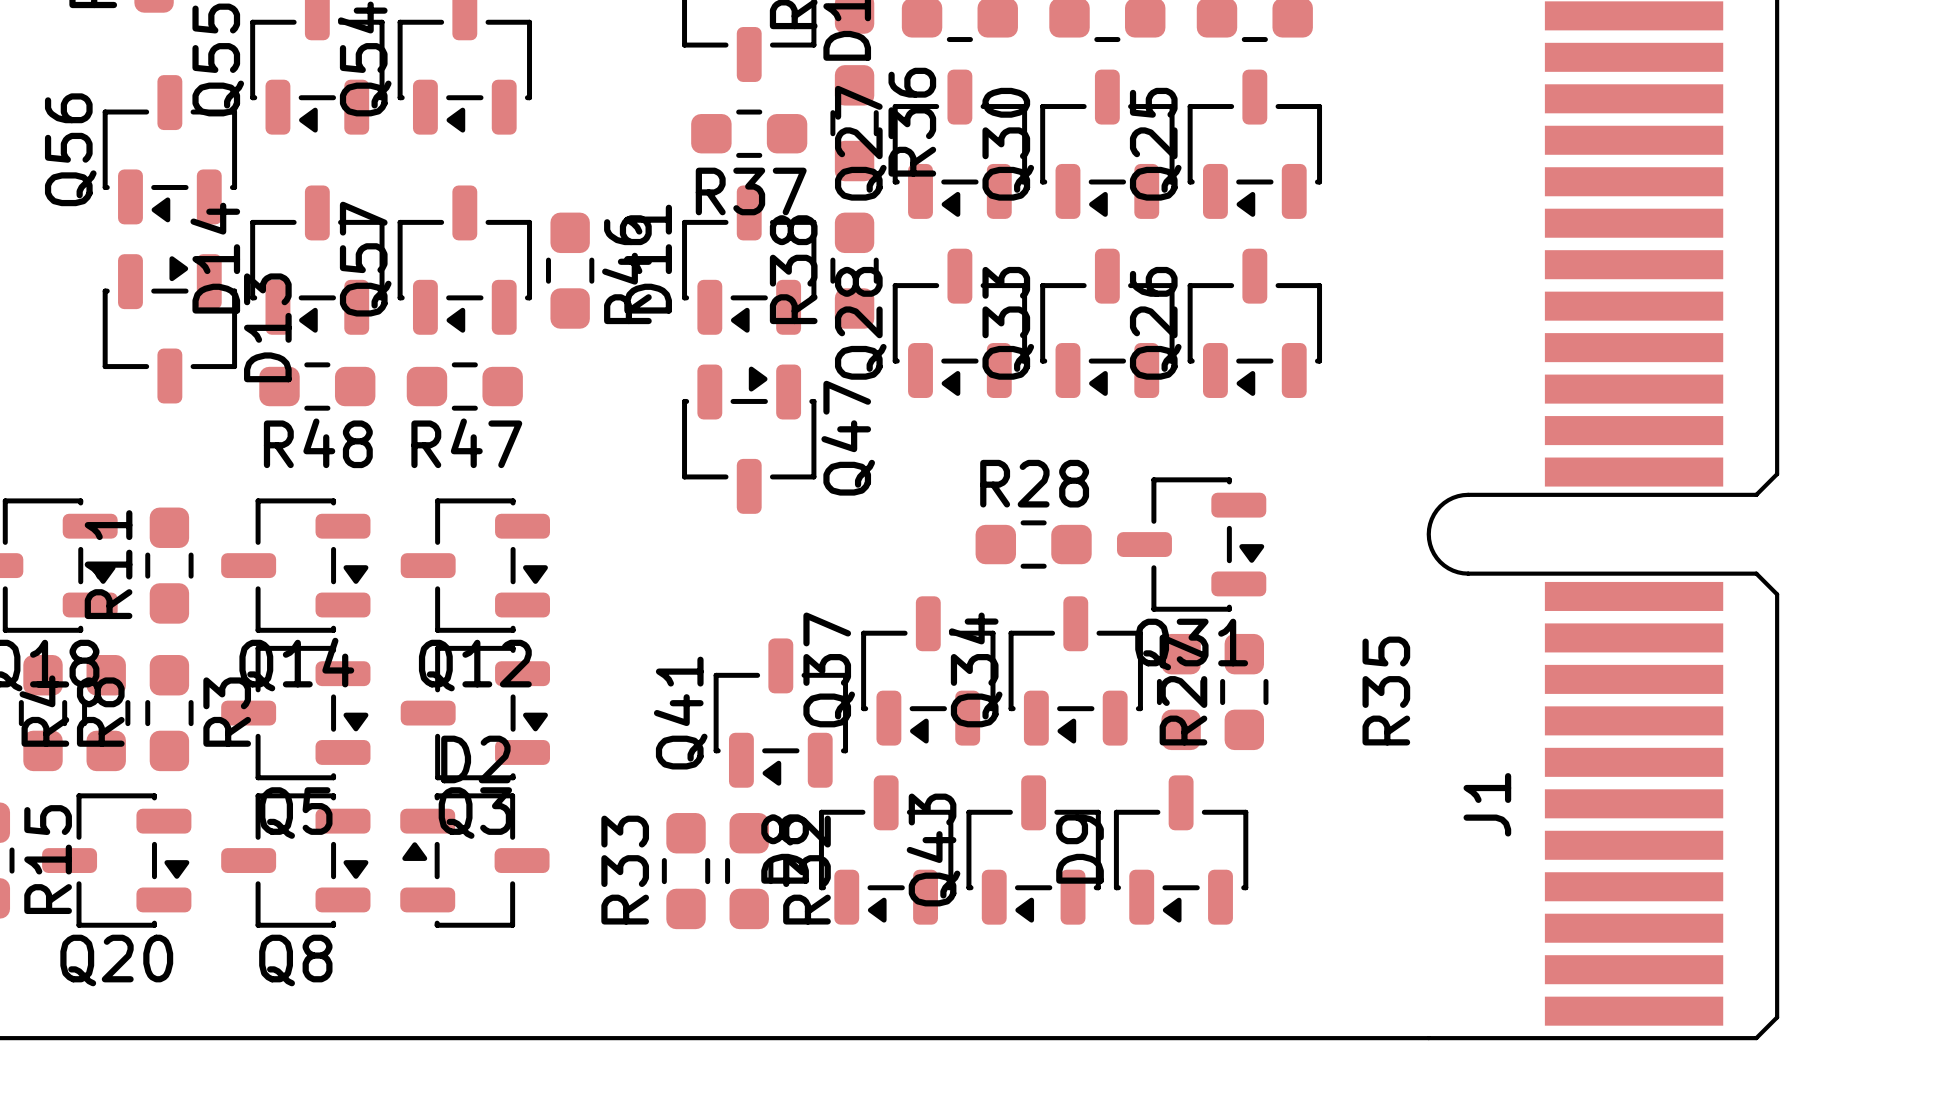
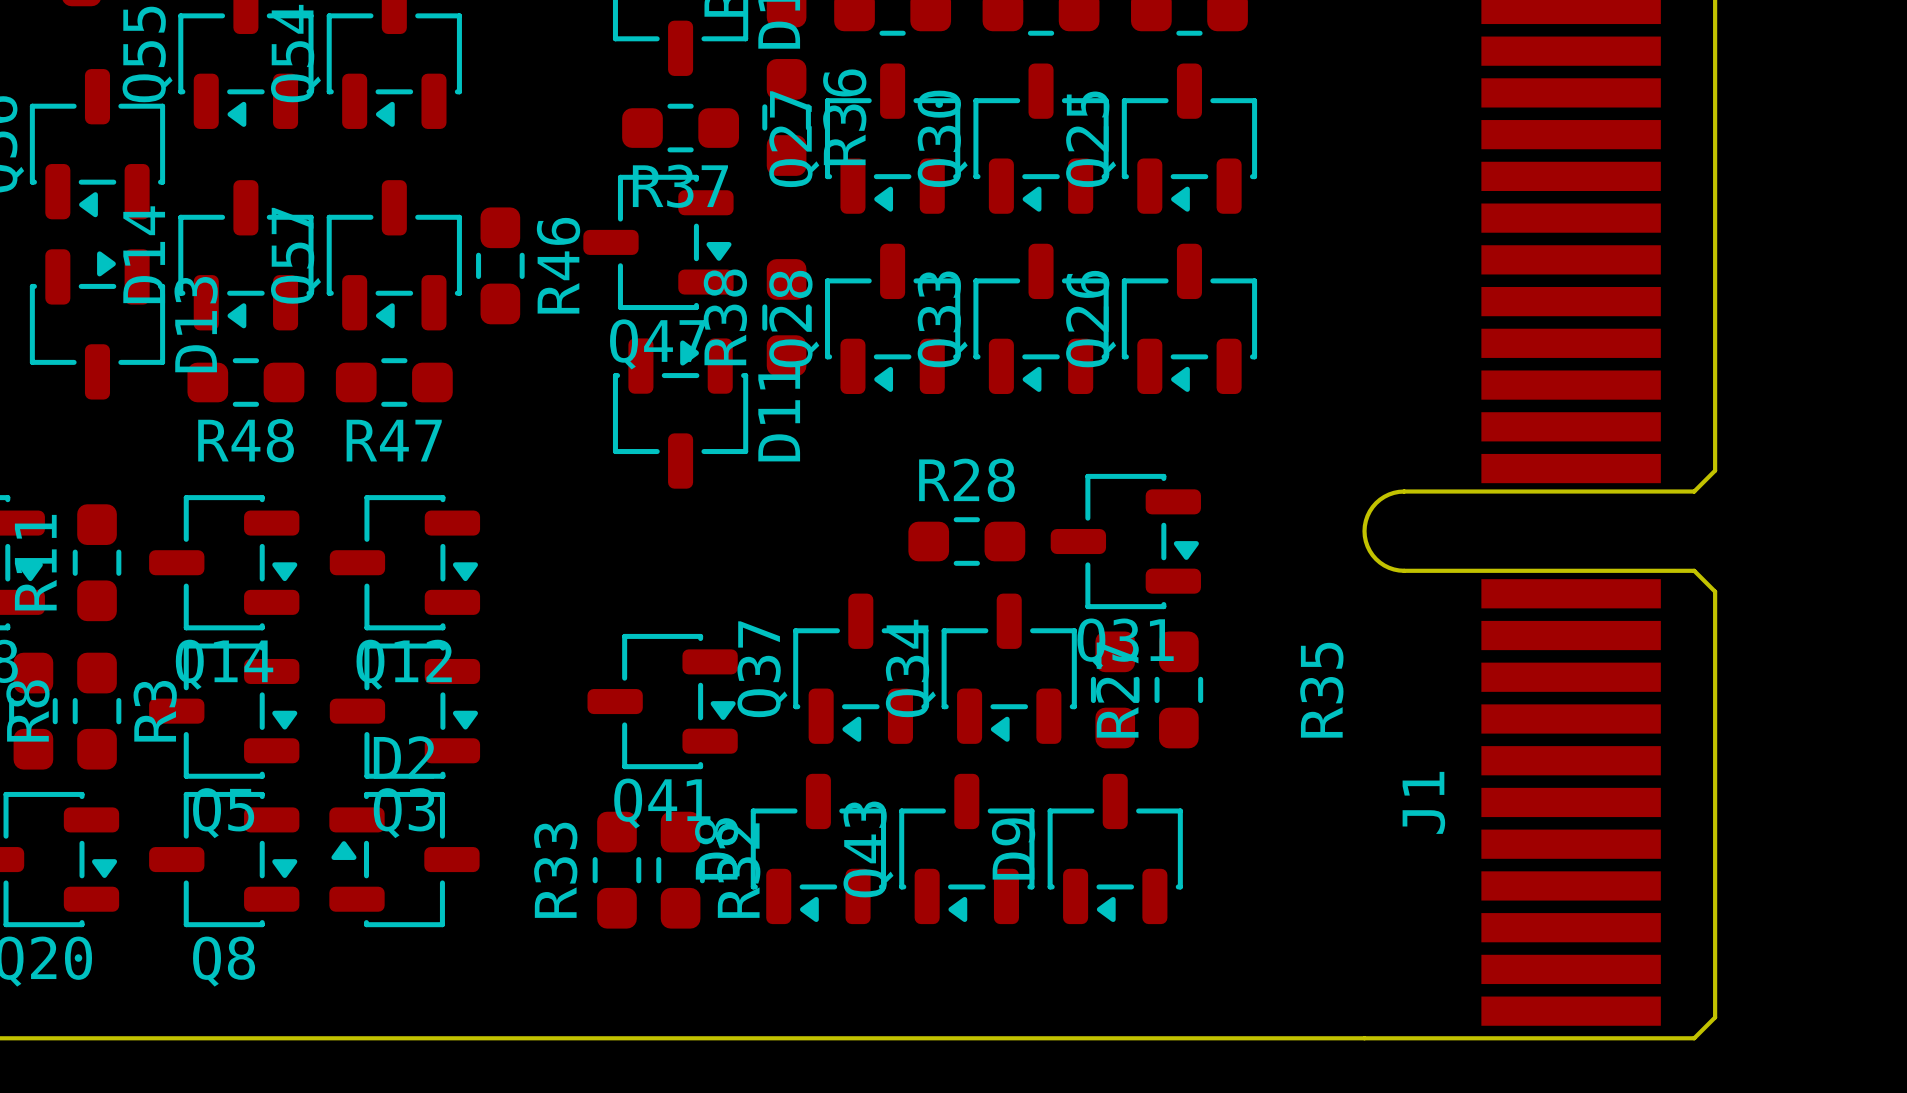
D11 rotation: 0° (749, 260) -> 180° (680, 413)
D11 position: (749, 260) -> (680, 413)
R38 position: (854, 270) -> (786, 317)
Q47 rotation: 0° (749, 439) -> 90° clockwise (658, 242)
Q47 position: (749, 439) -> (658, 242)
Q41 rotation: 0° (780, 713) -> 90° counterclockwise (662, 701)

